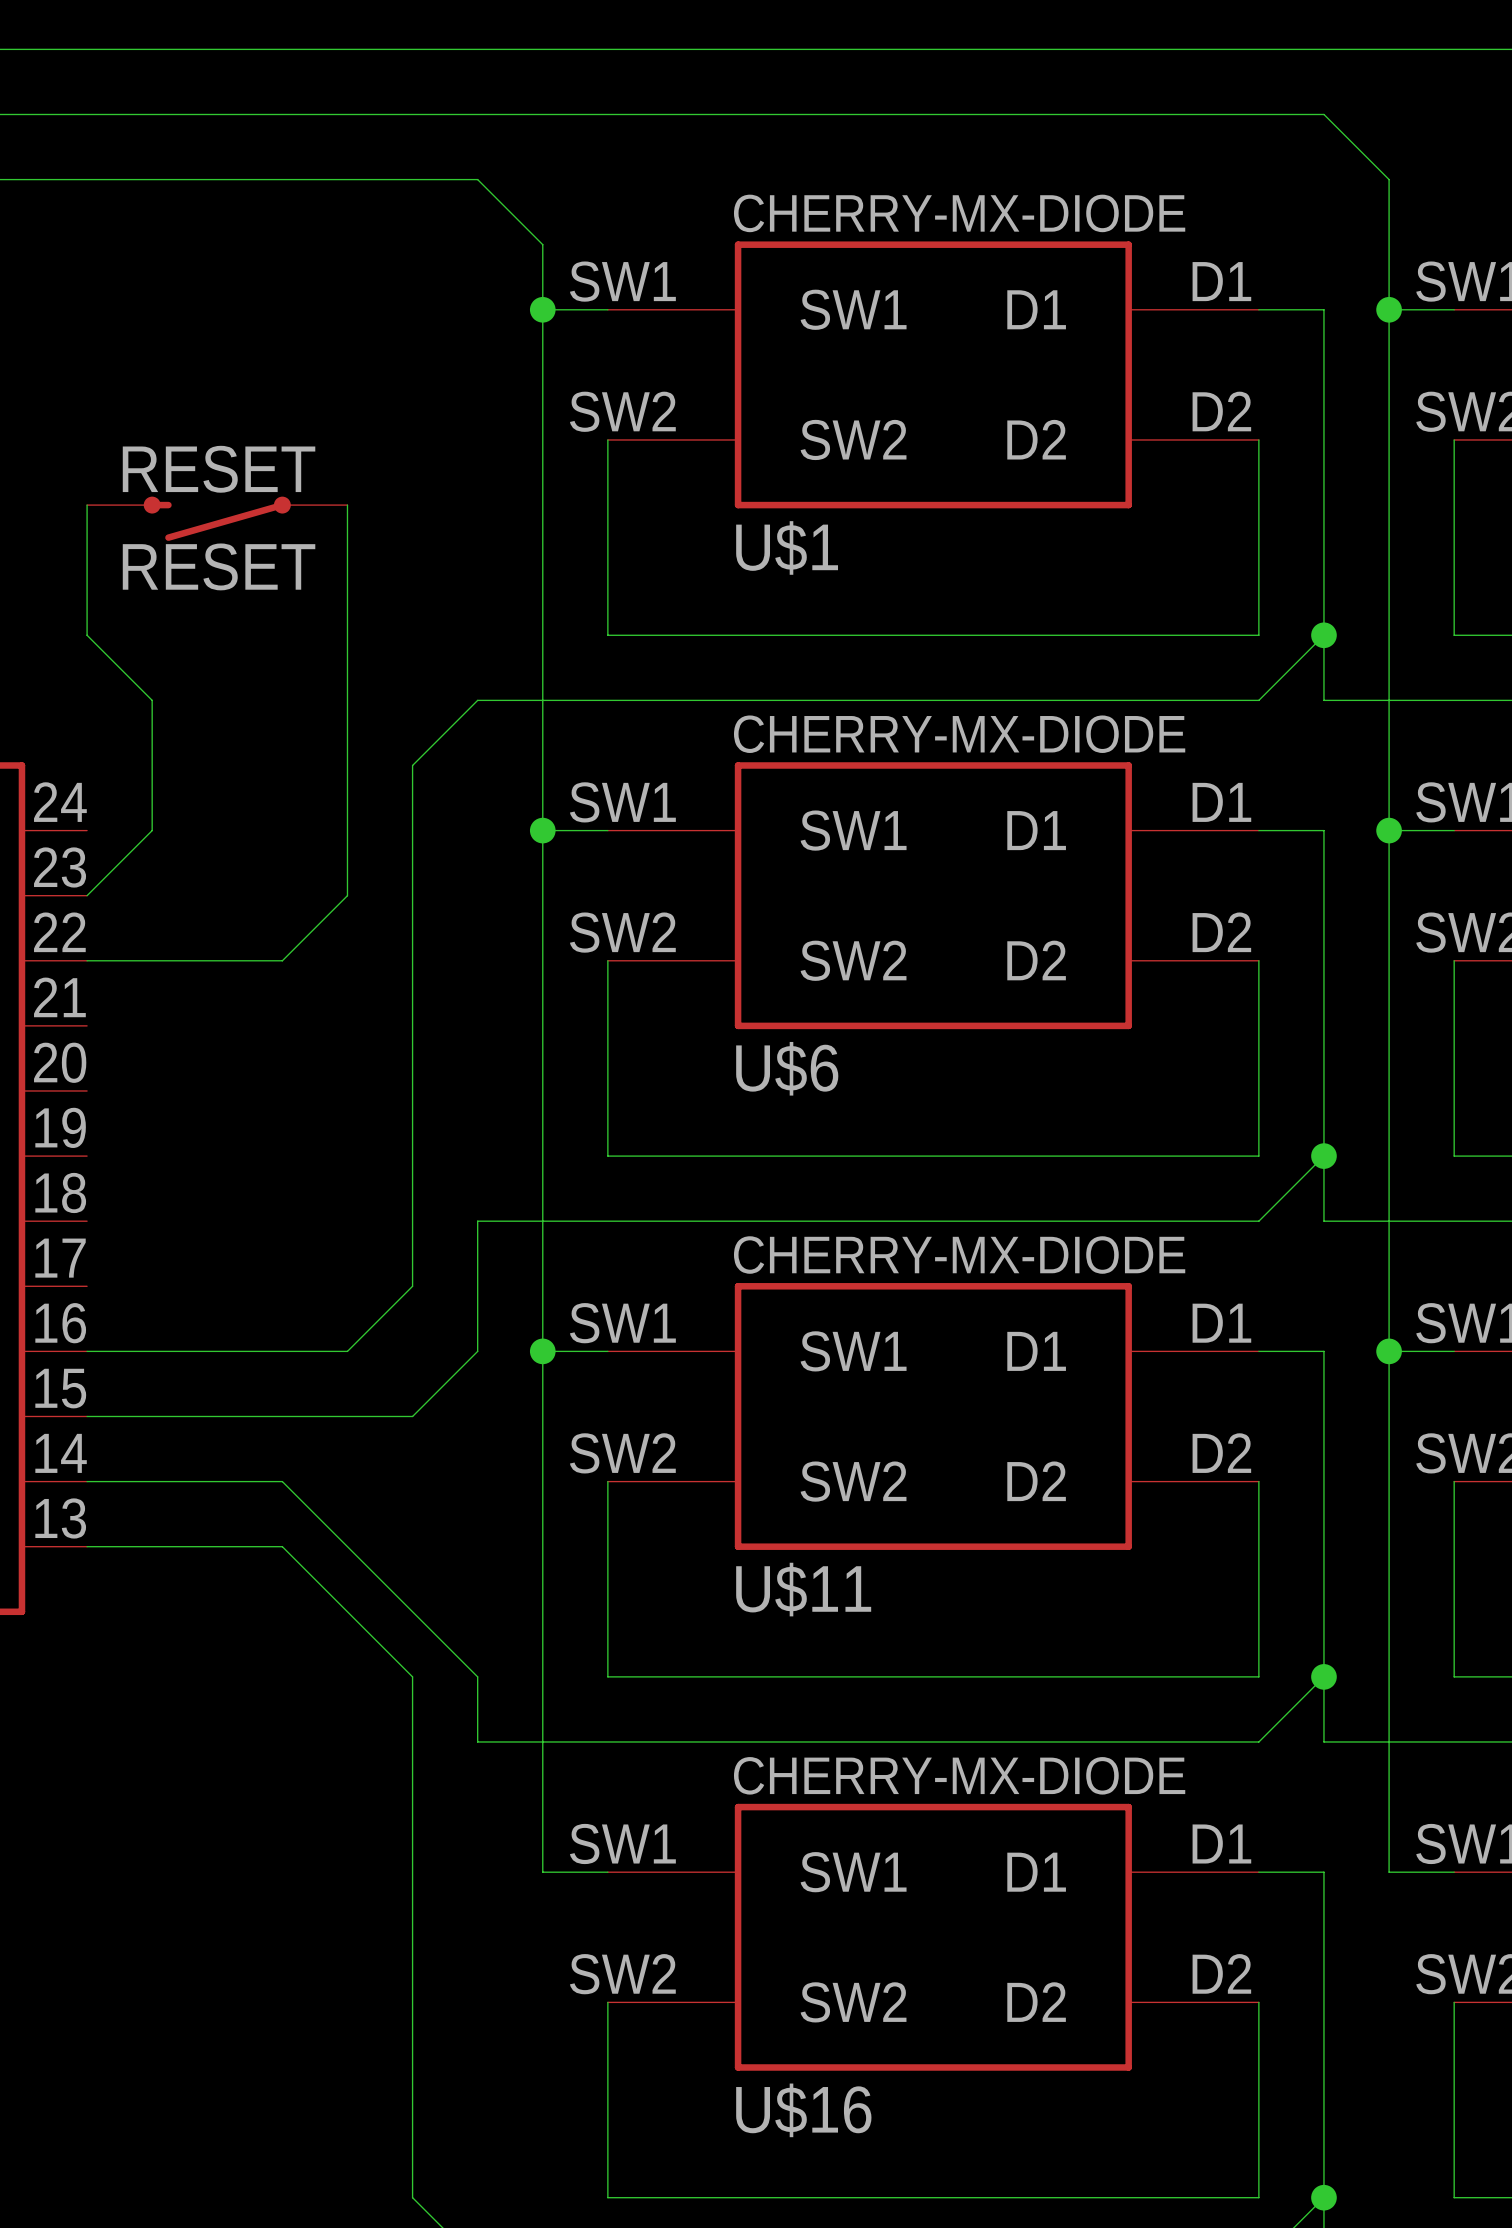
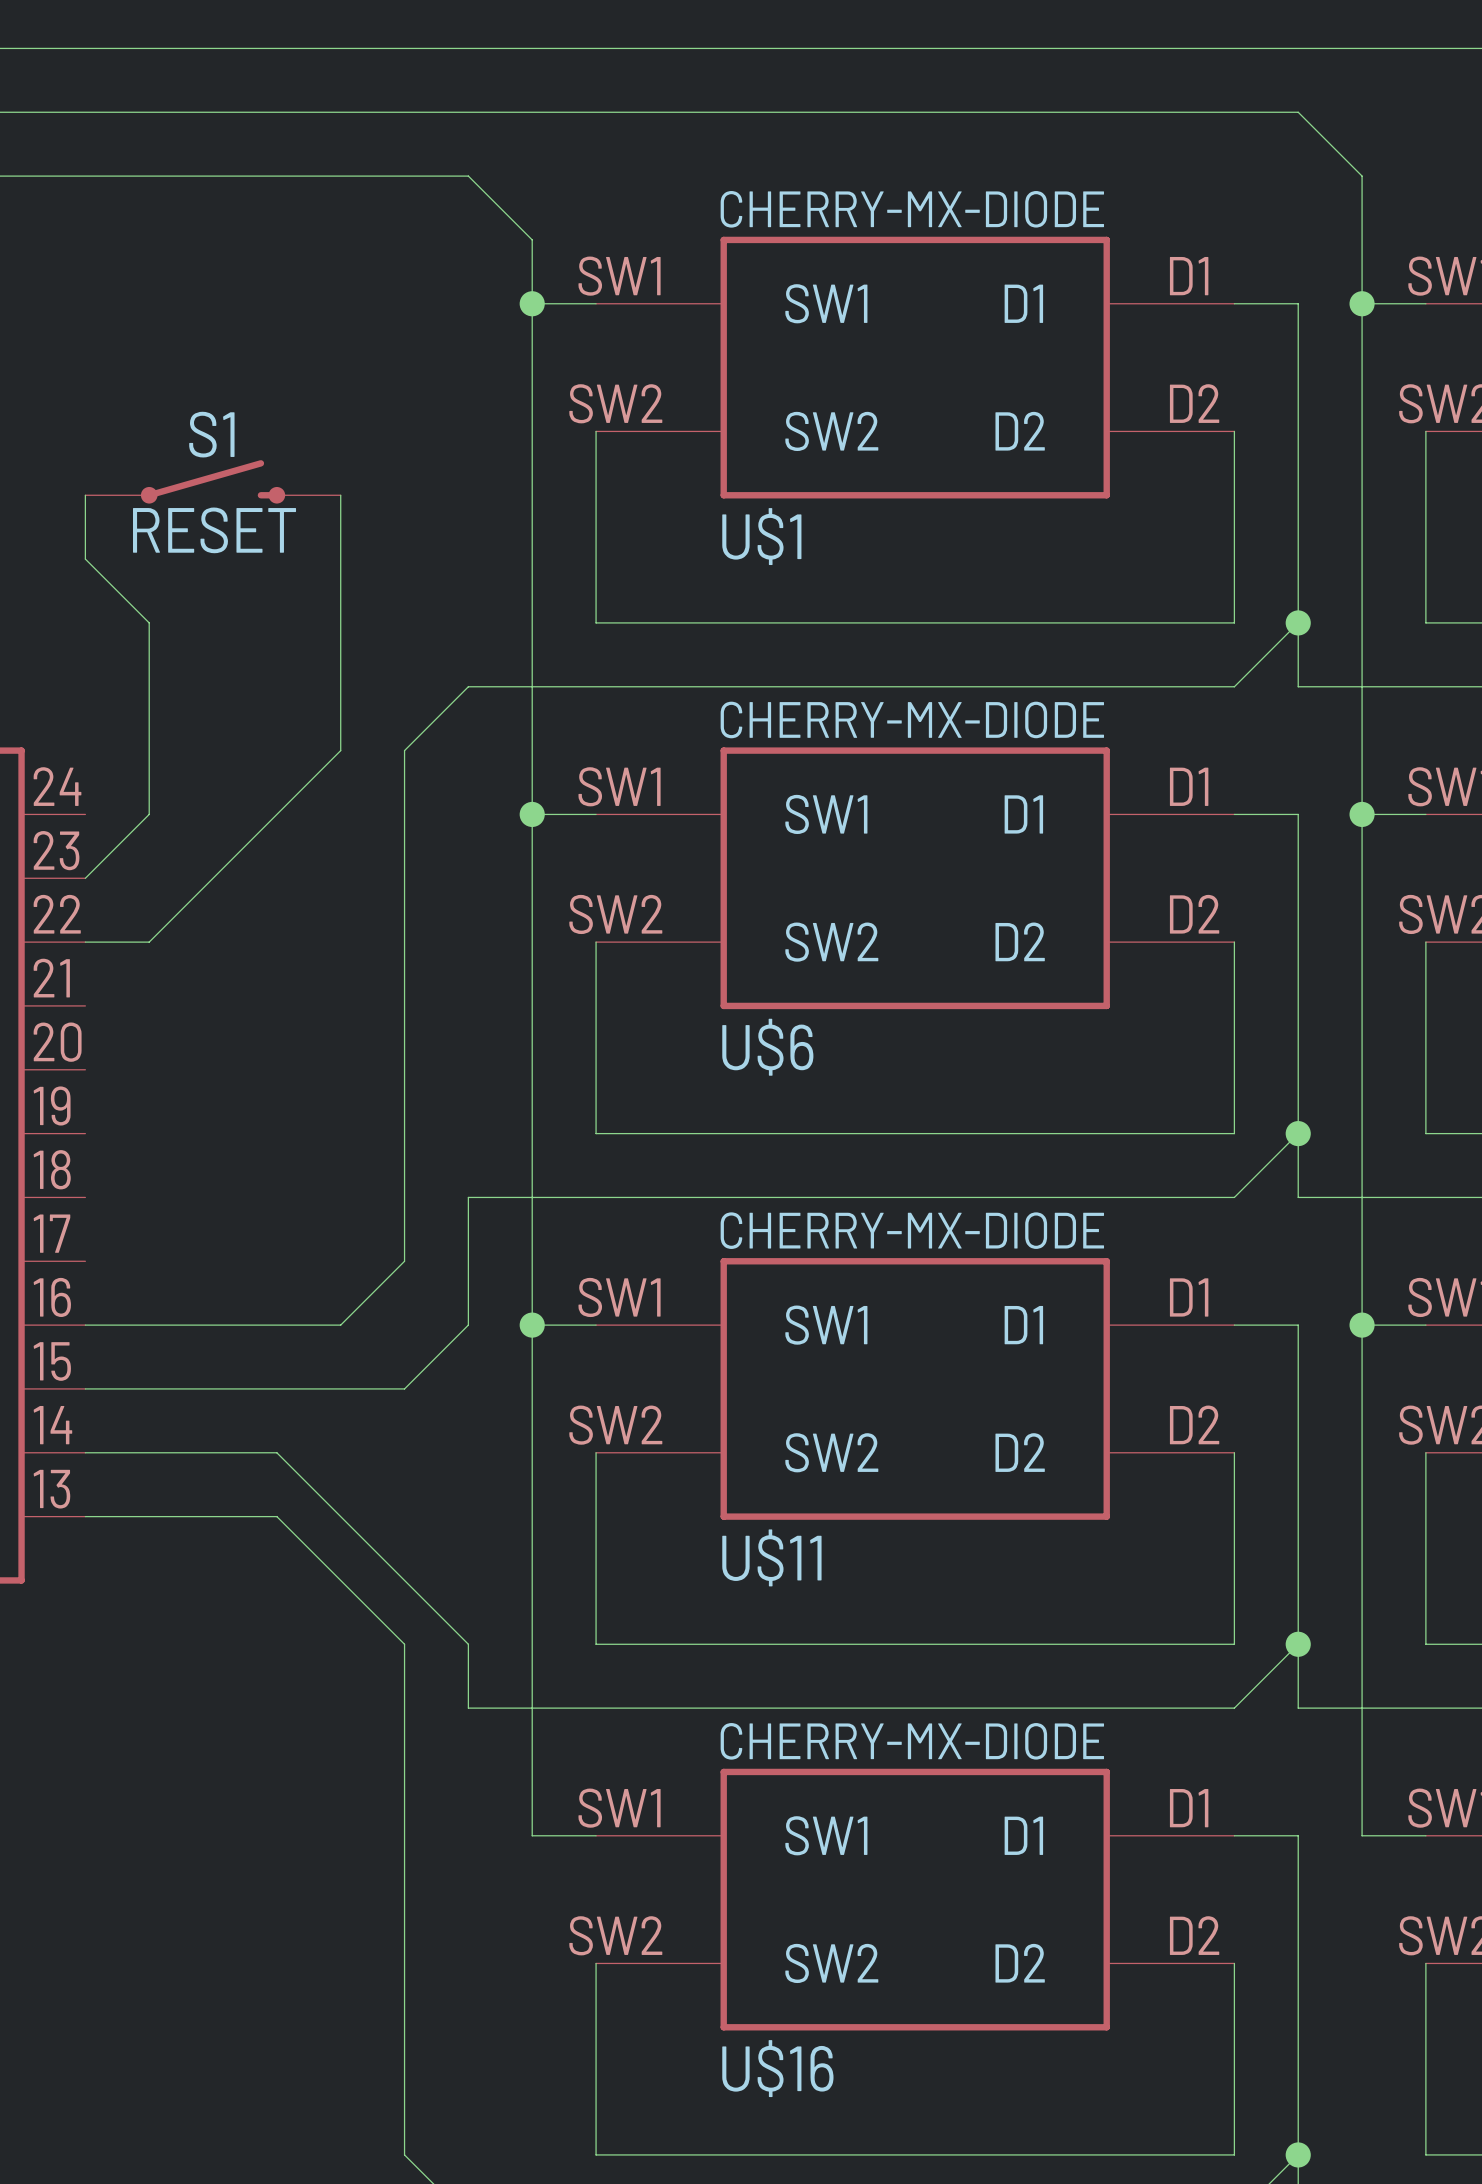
S1: none -> RESET (213, 481)
RESET: RESET (217, 518) -> none
wire: (87, 570) (87, 635) (152, 700) -> (85, 559) (149, 622) (149, 686)
wire: (347, 765) (347, 895) (282, 960) (152, 960) -> (340, 750) (149, 942)

